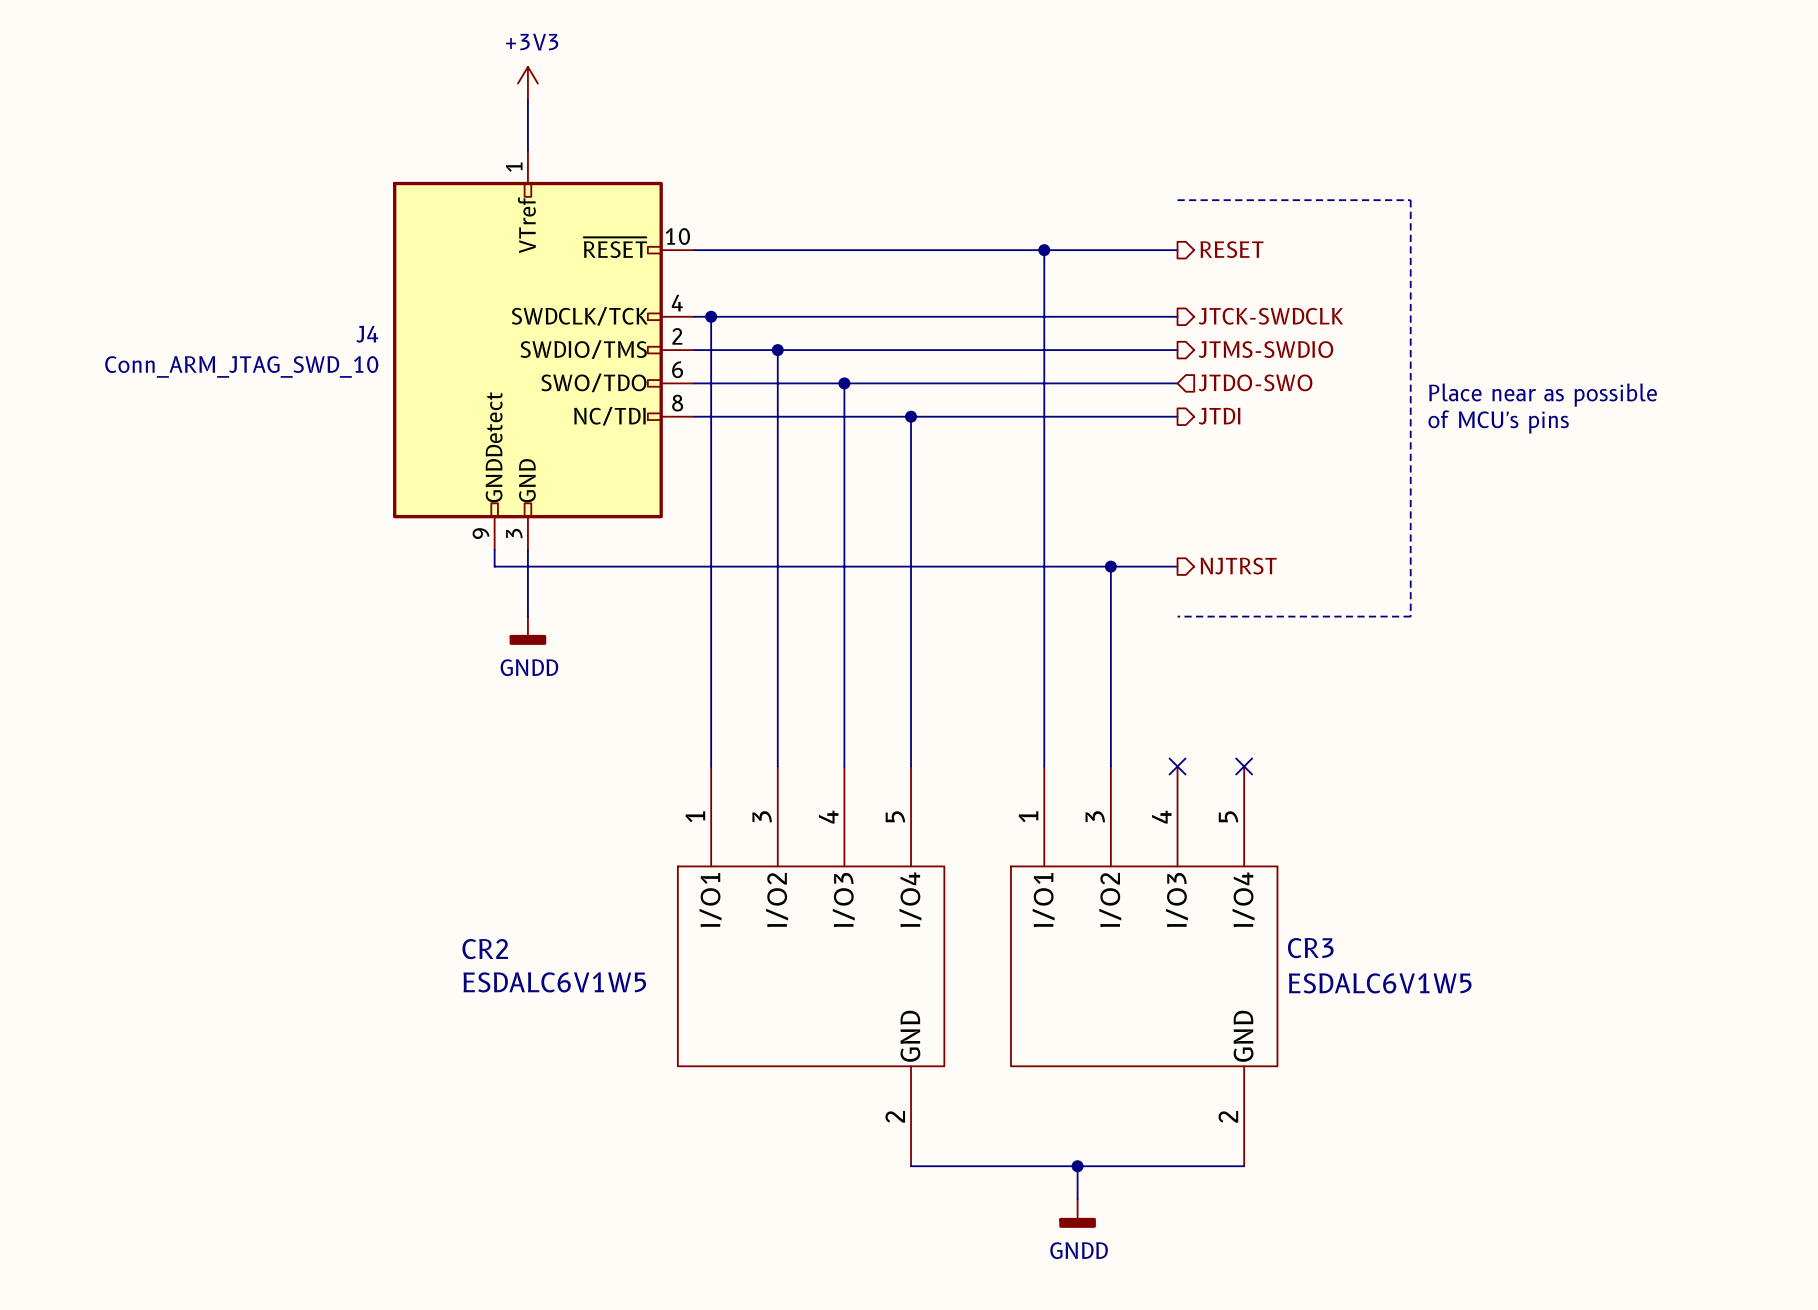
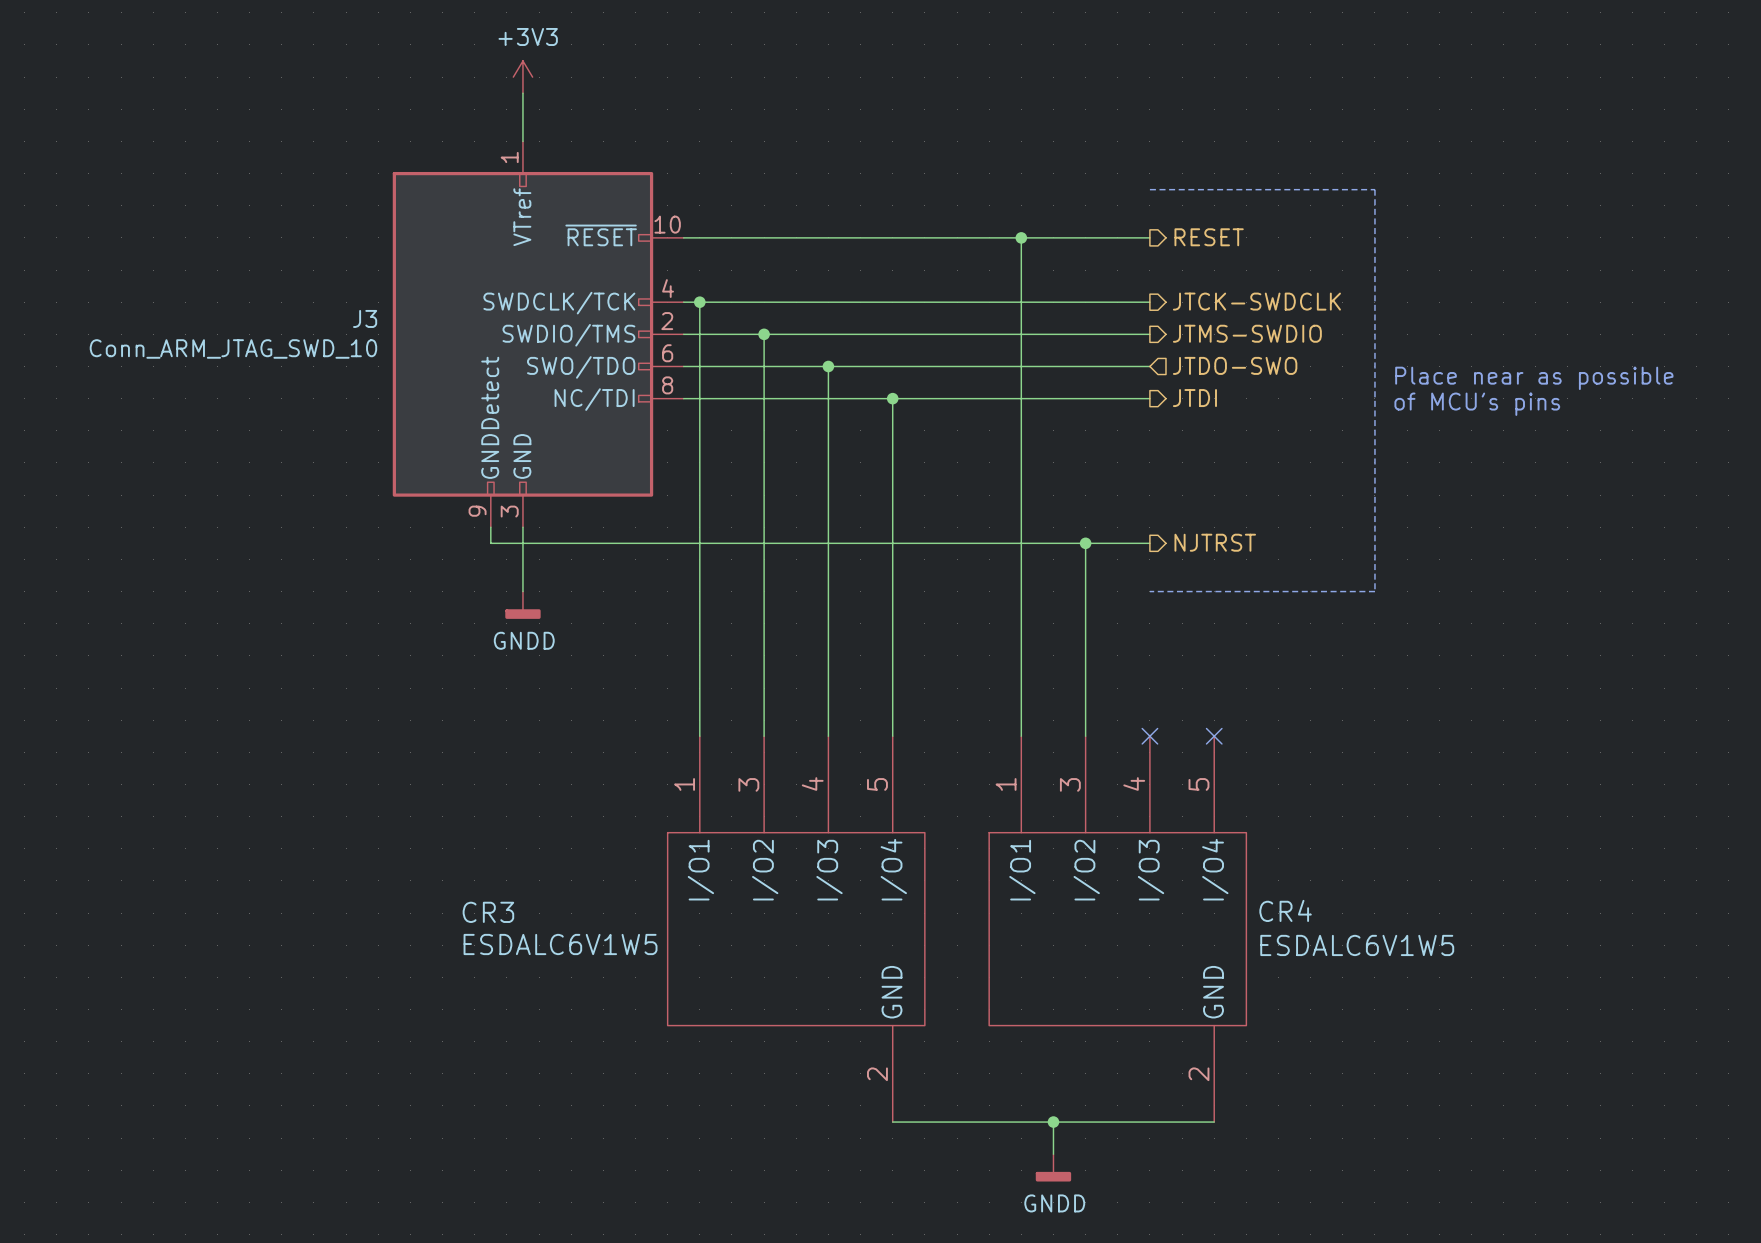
J4 name: J4 (367, 334) -> J3 (365, 318)
CR3 name: CR3 (1310, 948) -> CR4 (1285, 910)
CR2 name: CR2 (485, 949) -> CR3 (488, 912)

